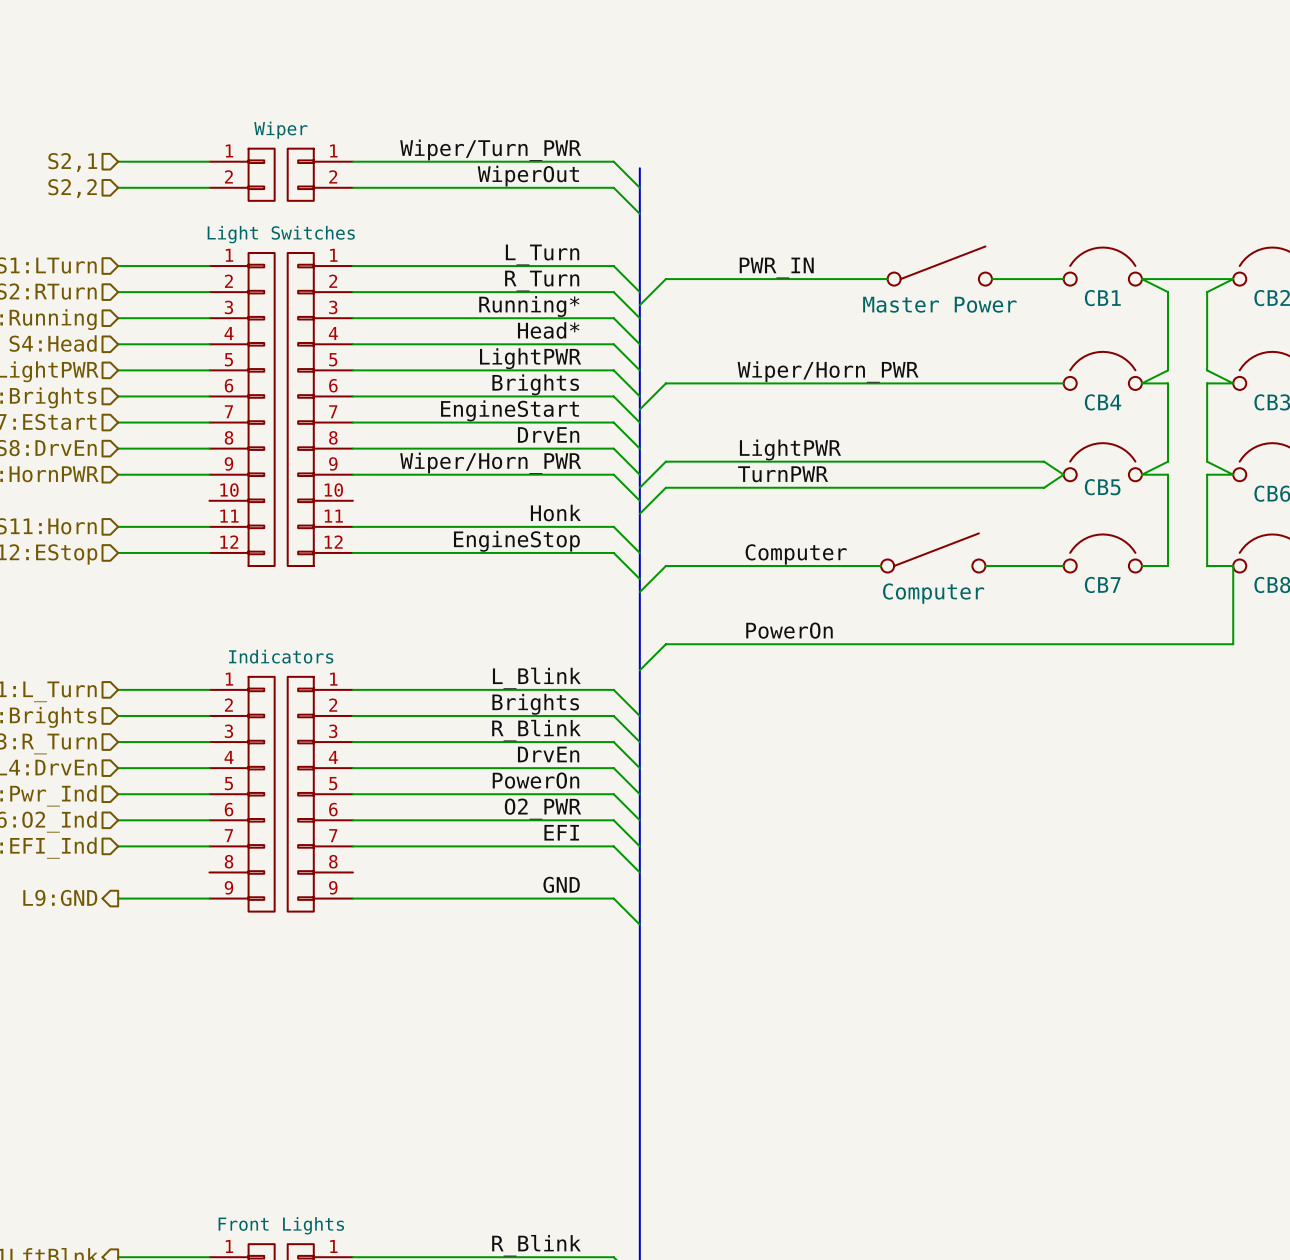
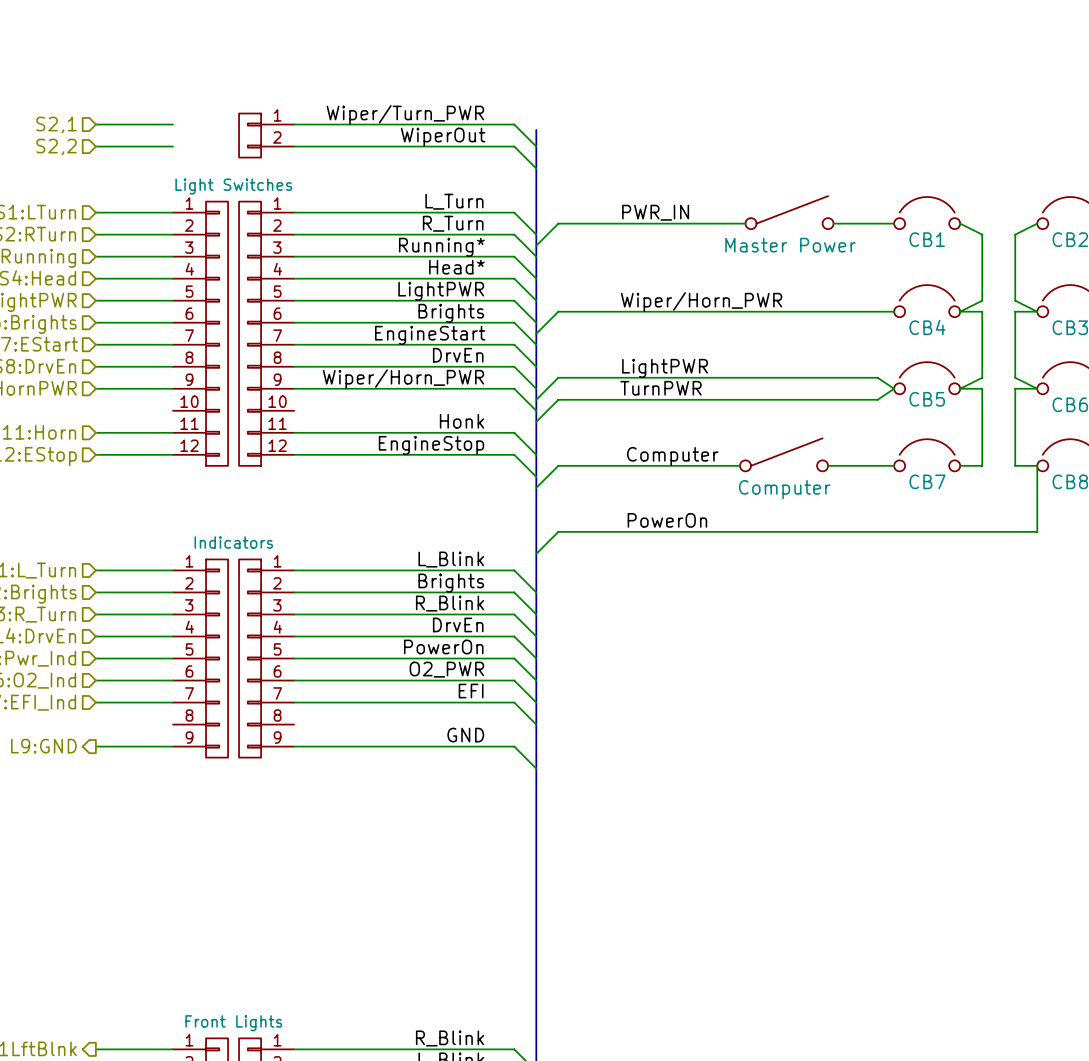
part: Wiper (242, 174) -> none
wire: (1141, 279) (1233, 279) -> none

